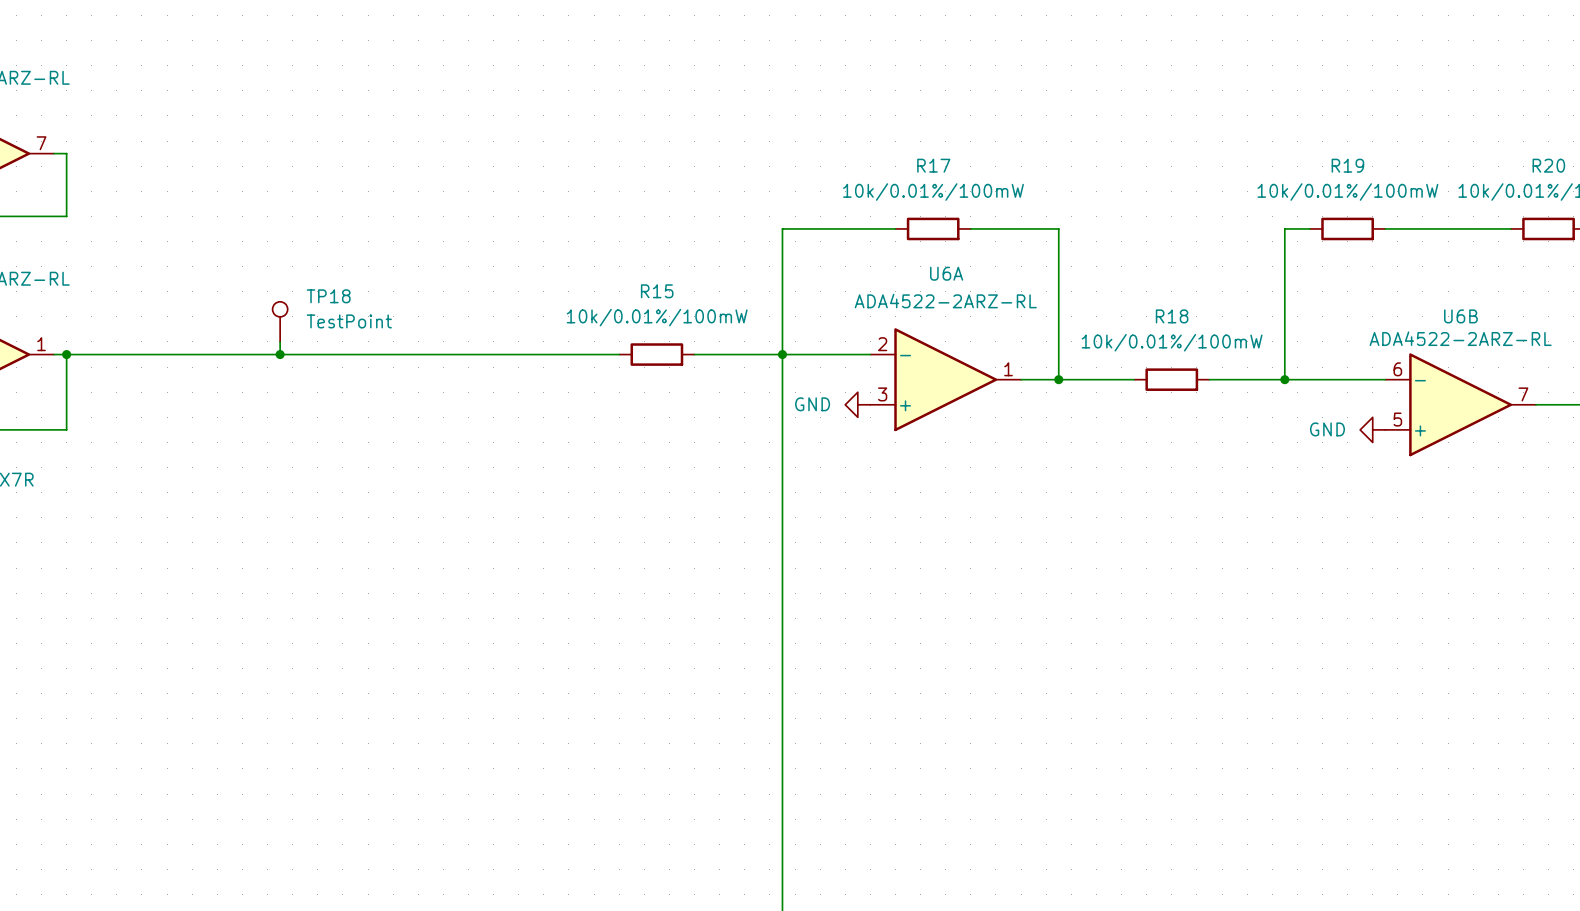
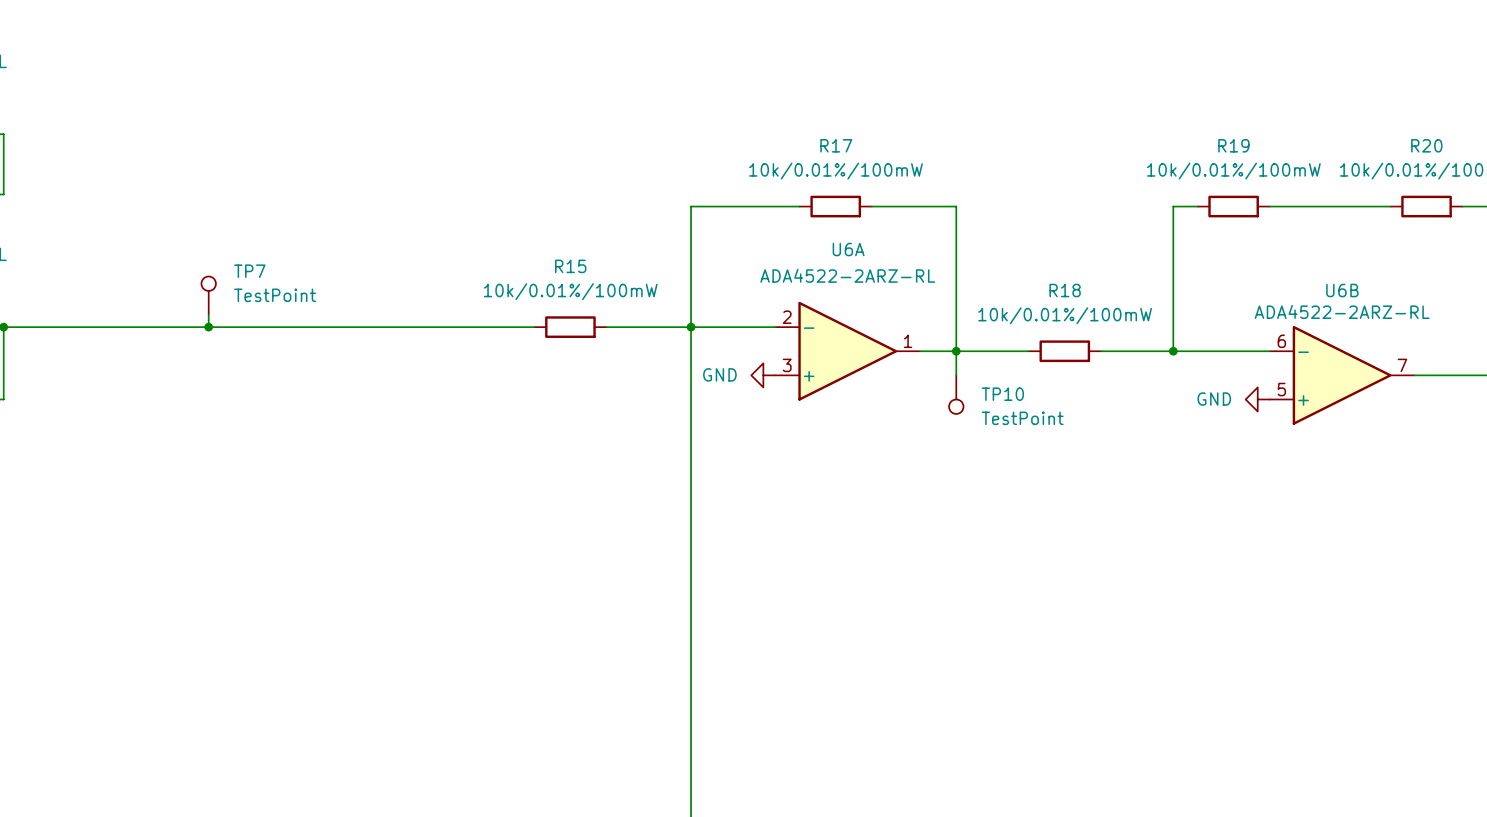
TP18 name: TP18 (328, 296) -> TP7 (249, 271)
wire: none -> (956, 351) (956, 375)
TP10: none -> TestPoint (956, 394)

